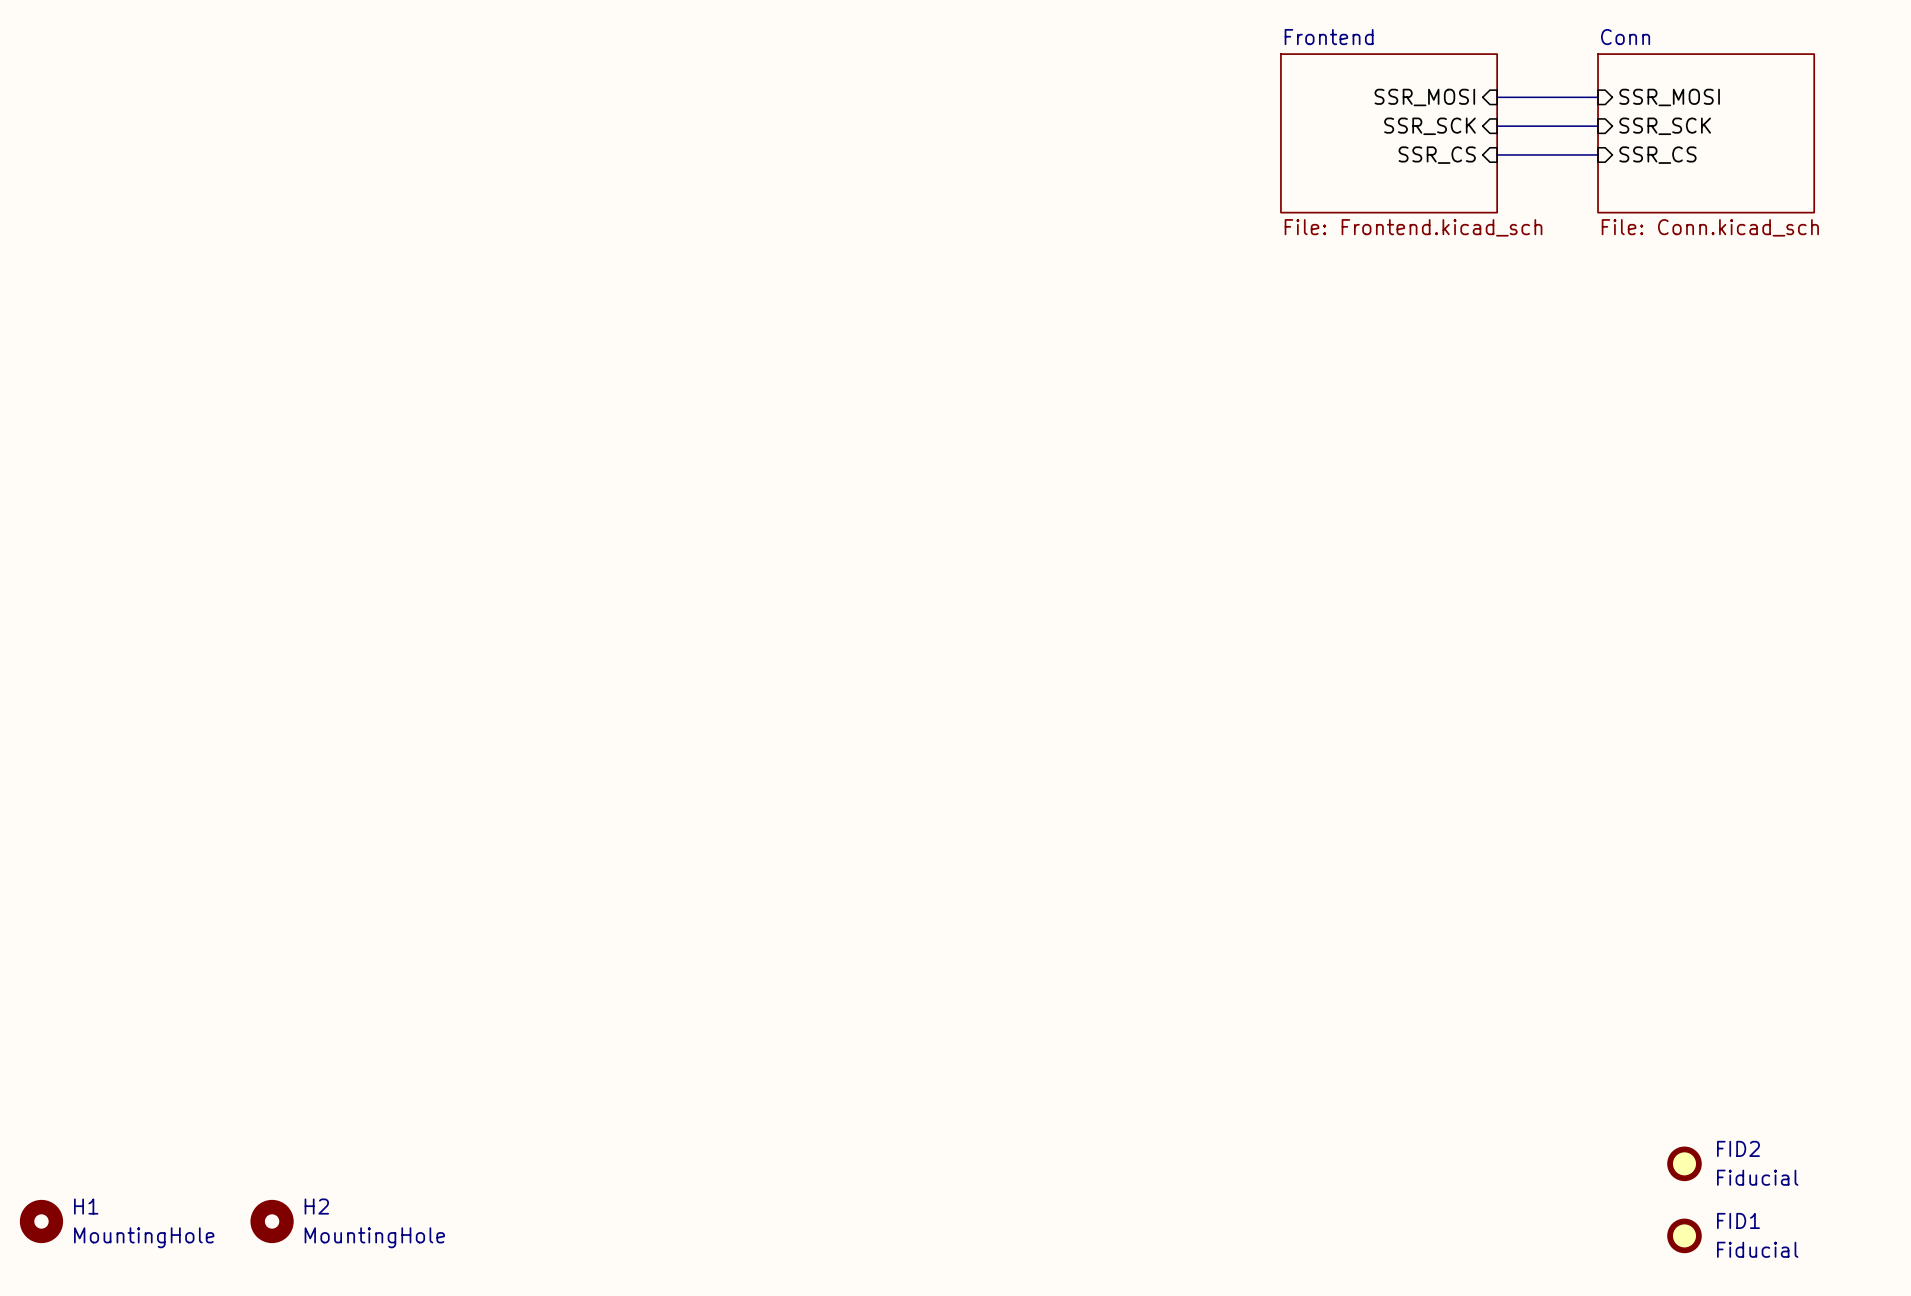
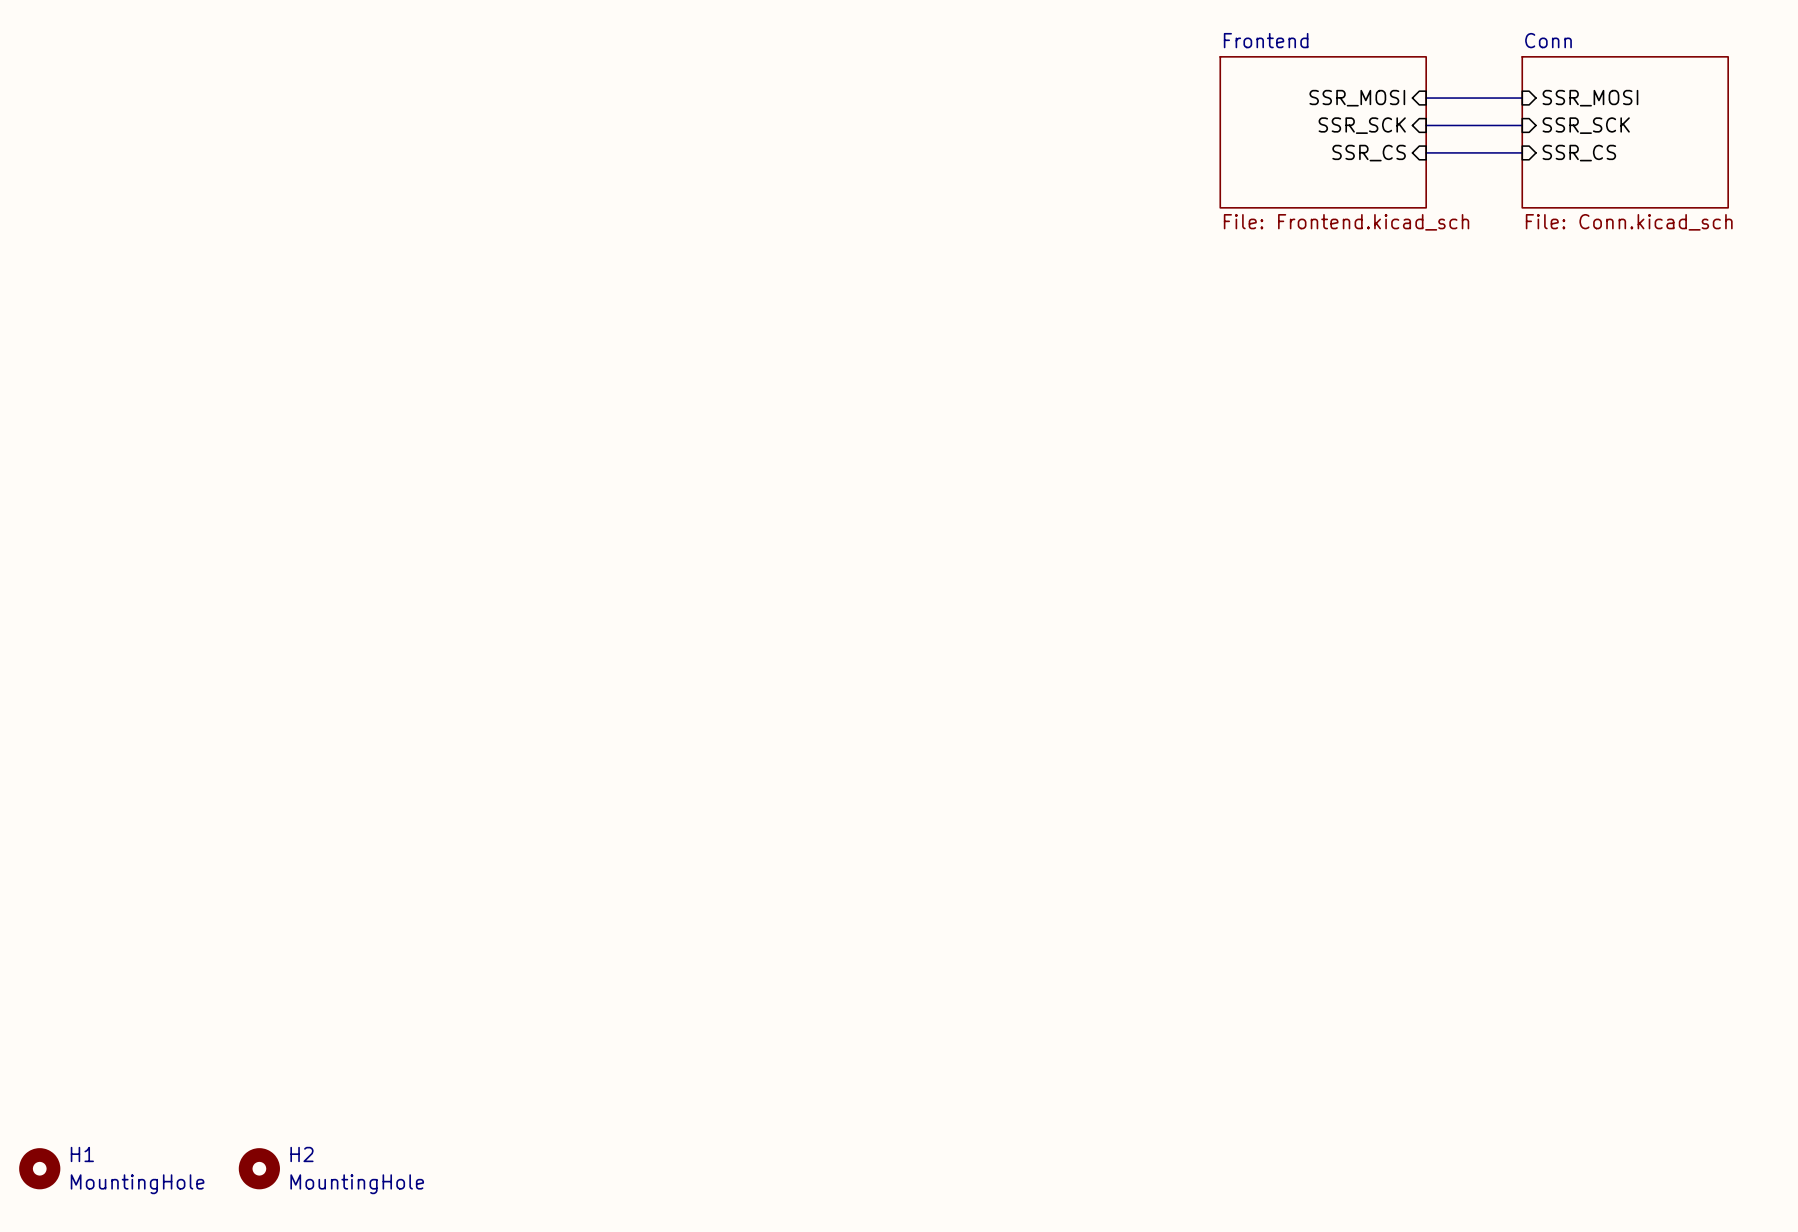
FID2: Fiducial (1684, 1163) -> none
FID1: Fiducial (1684, 1235) -> none

